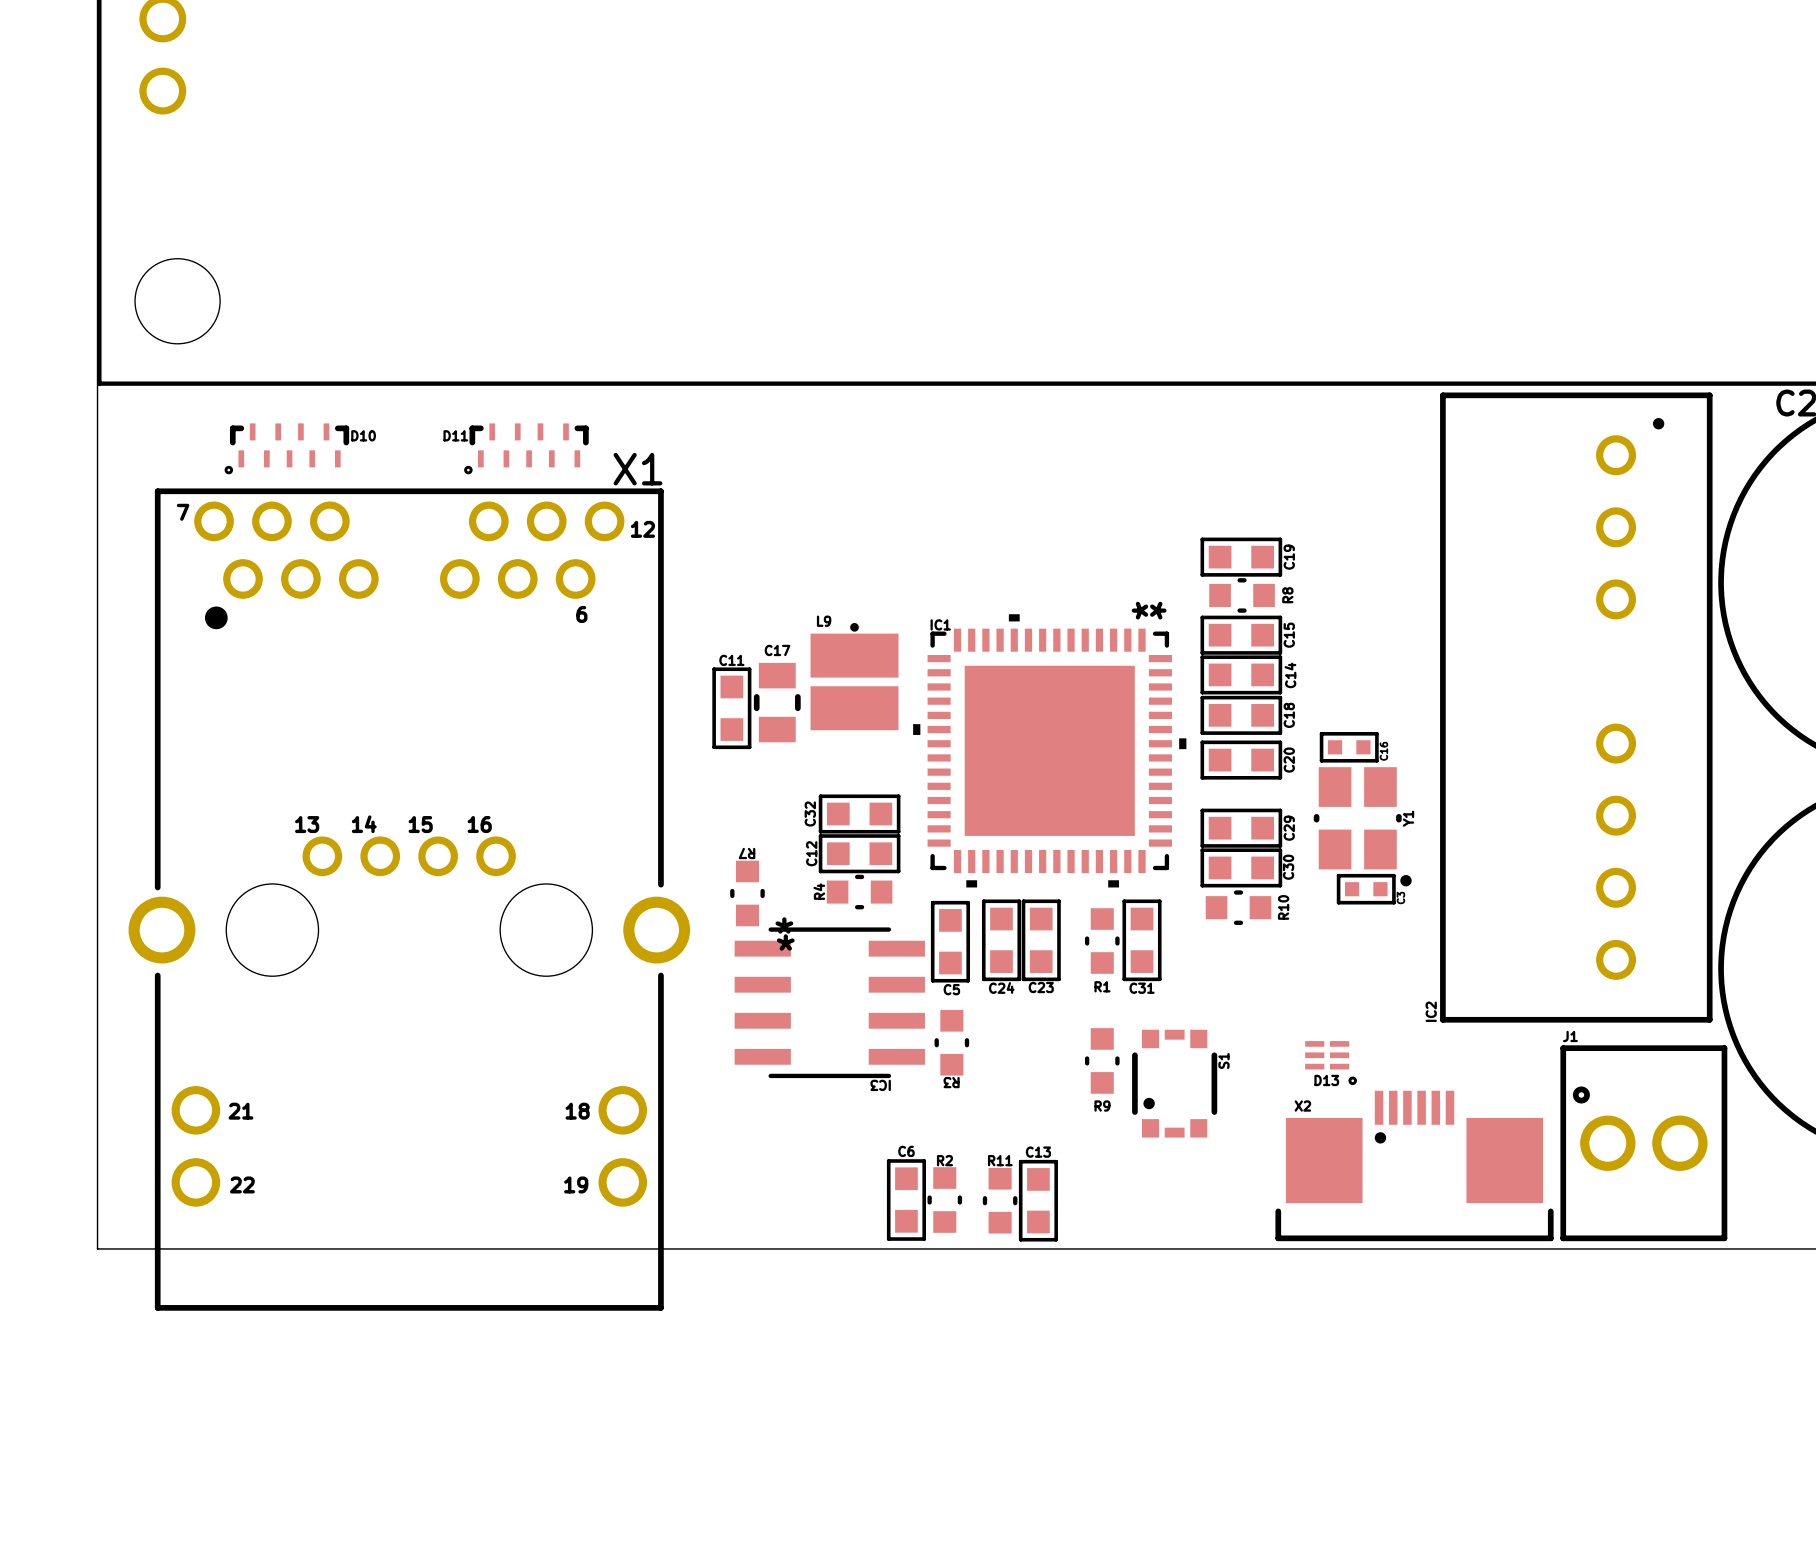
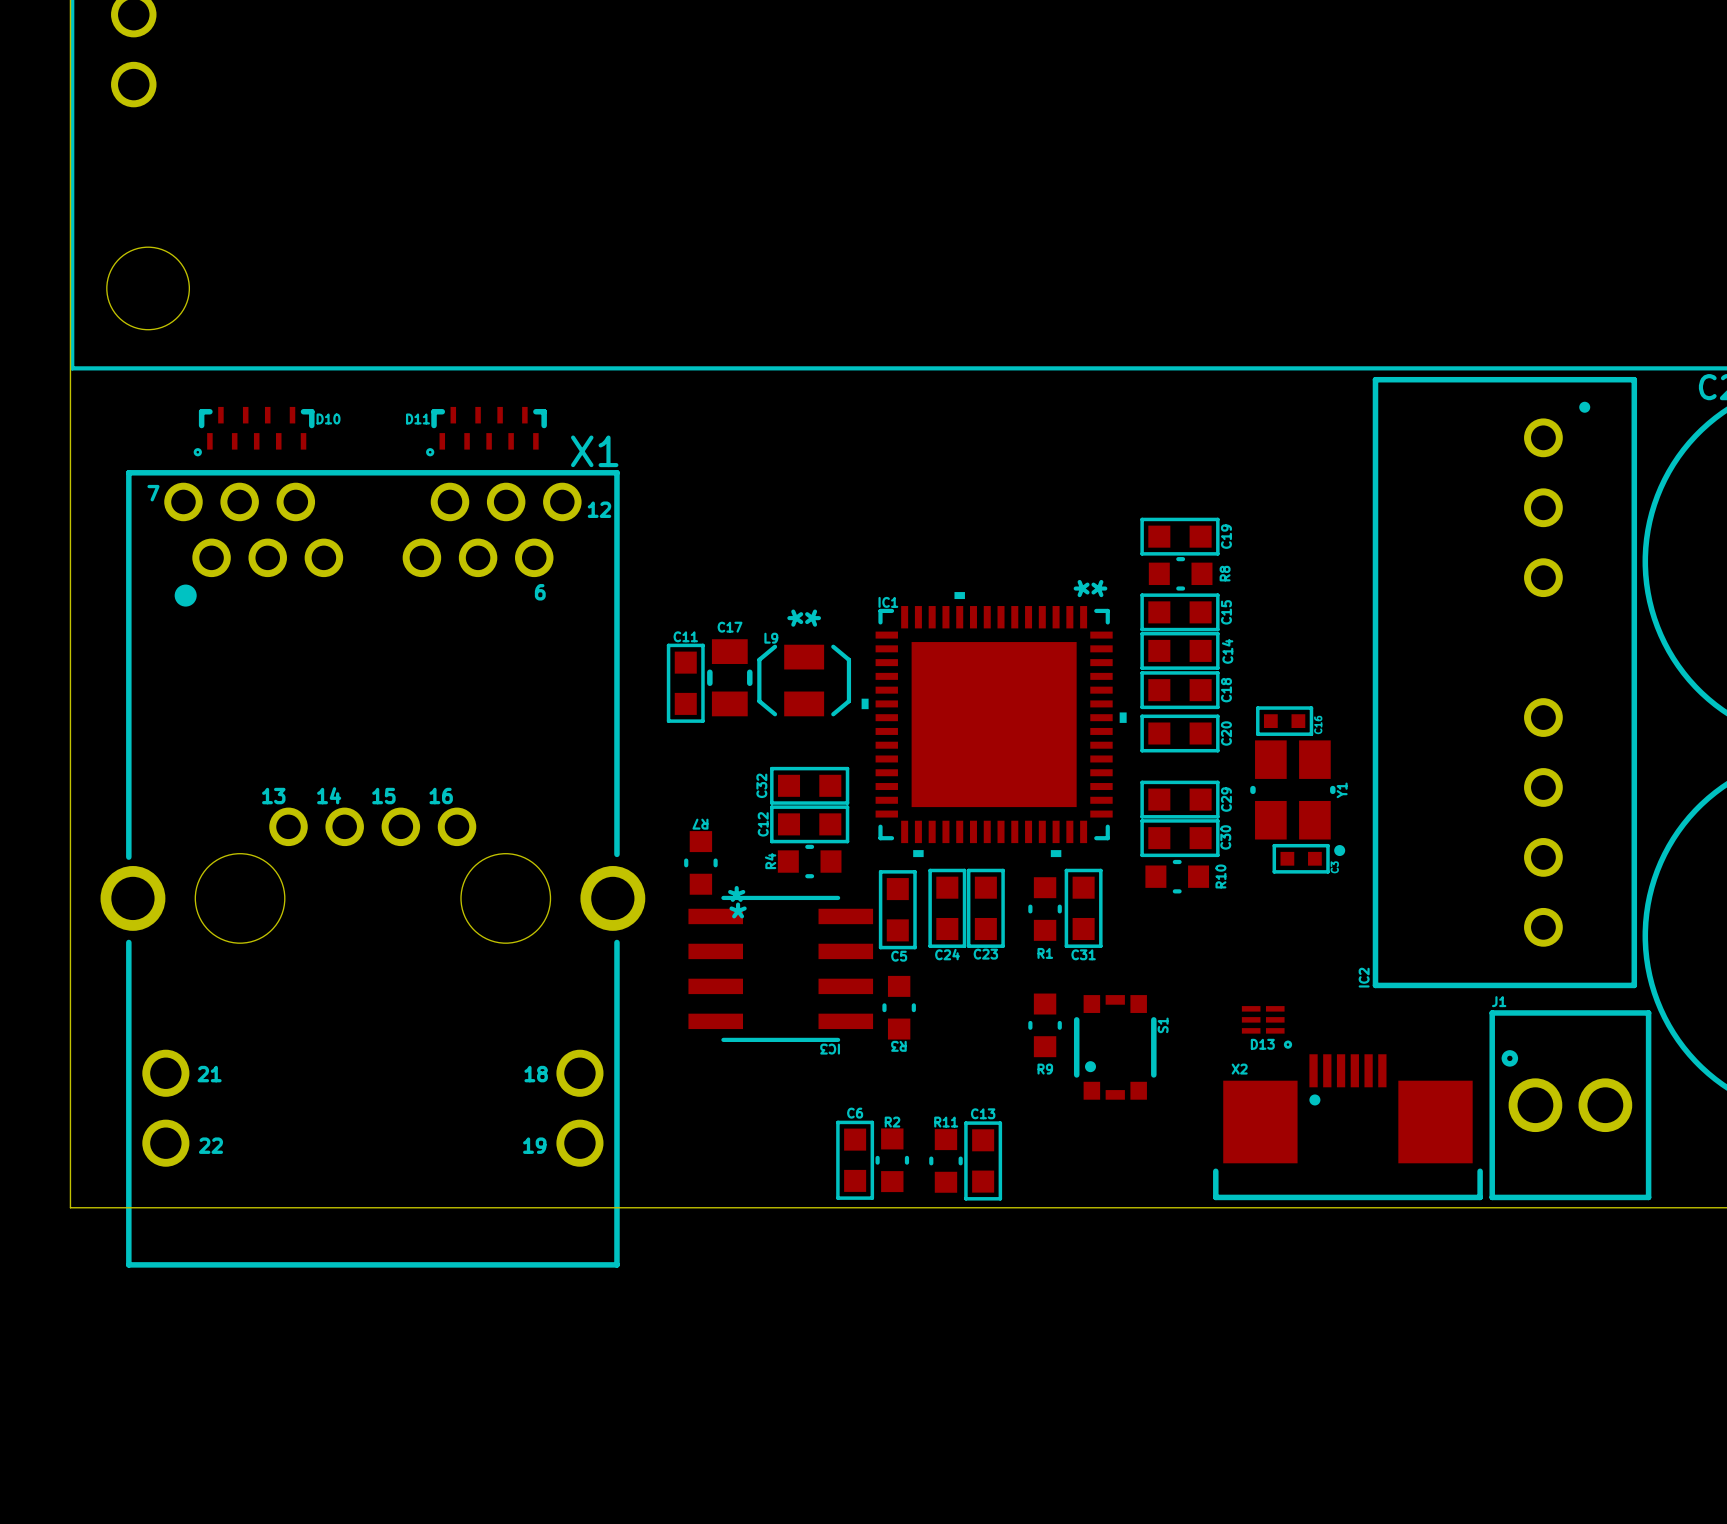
L9 footprint: [810, 623, 899, 731] -> [757, 644, 852, 717]

